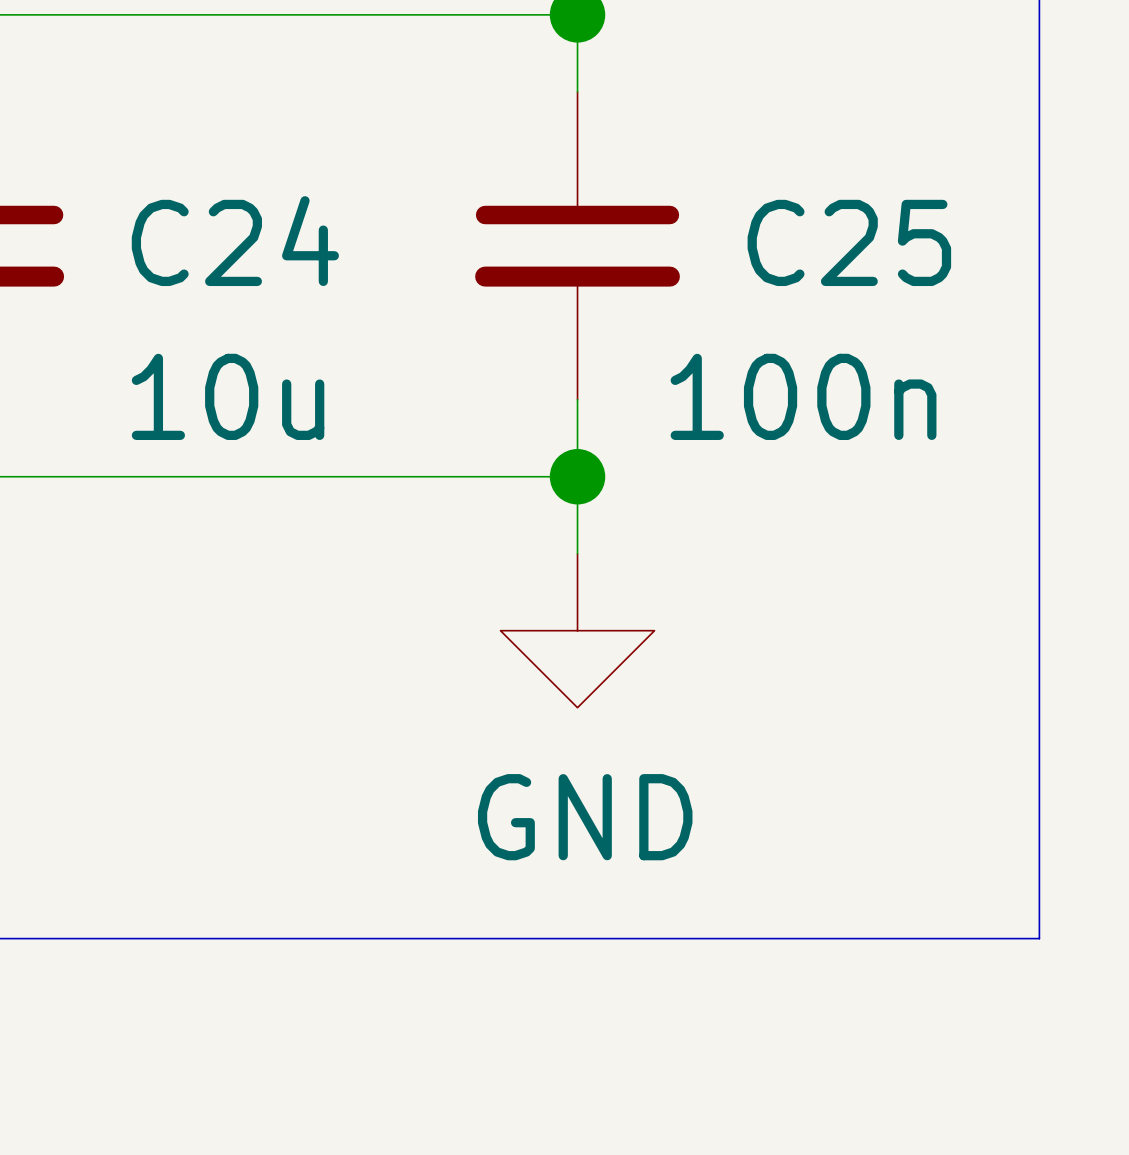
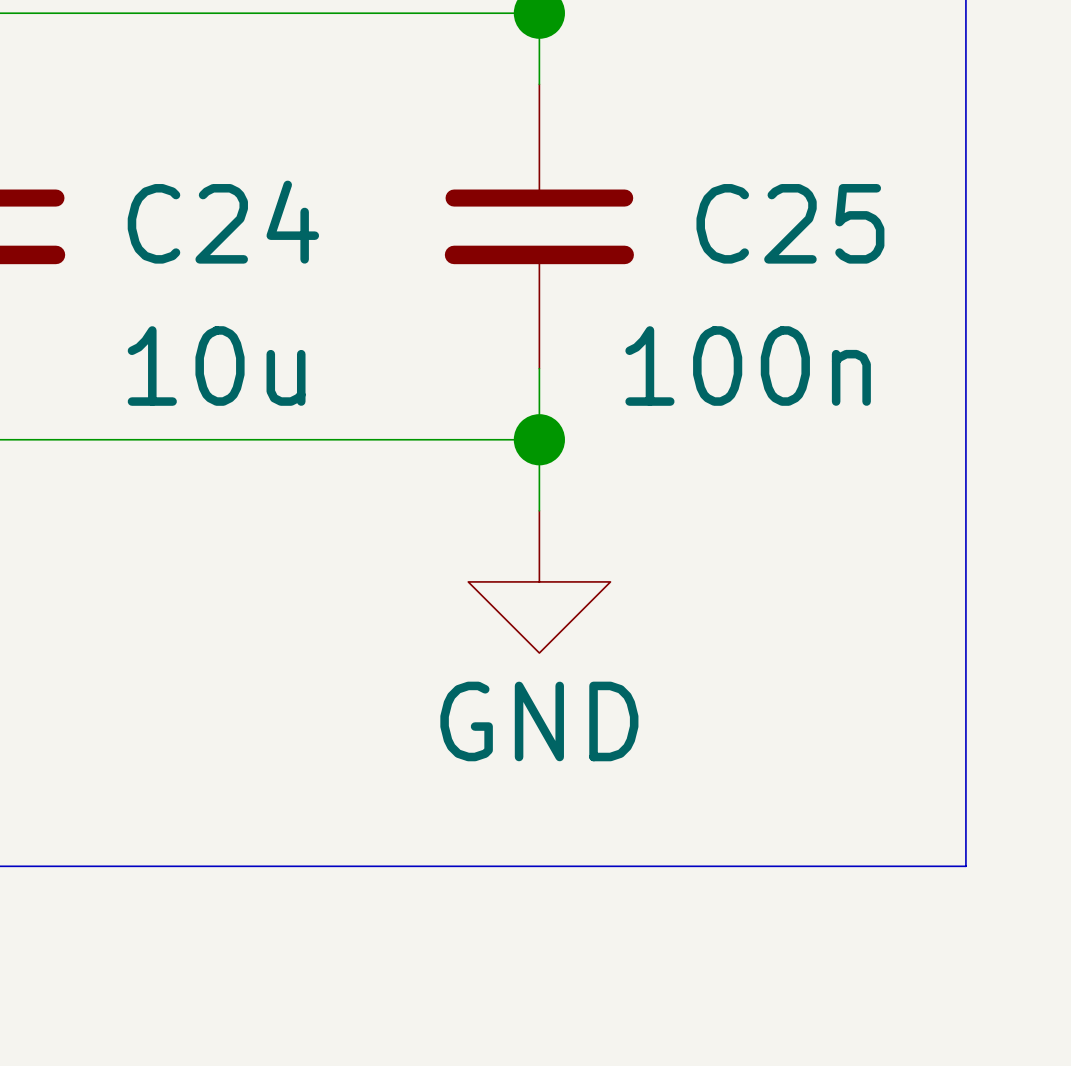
power symbol text position: GND (585, 817) -> GND (539, 721)

